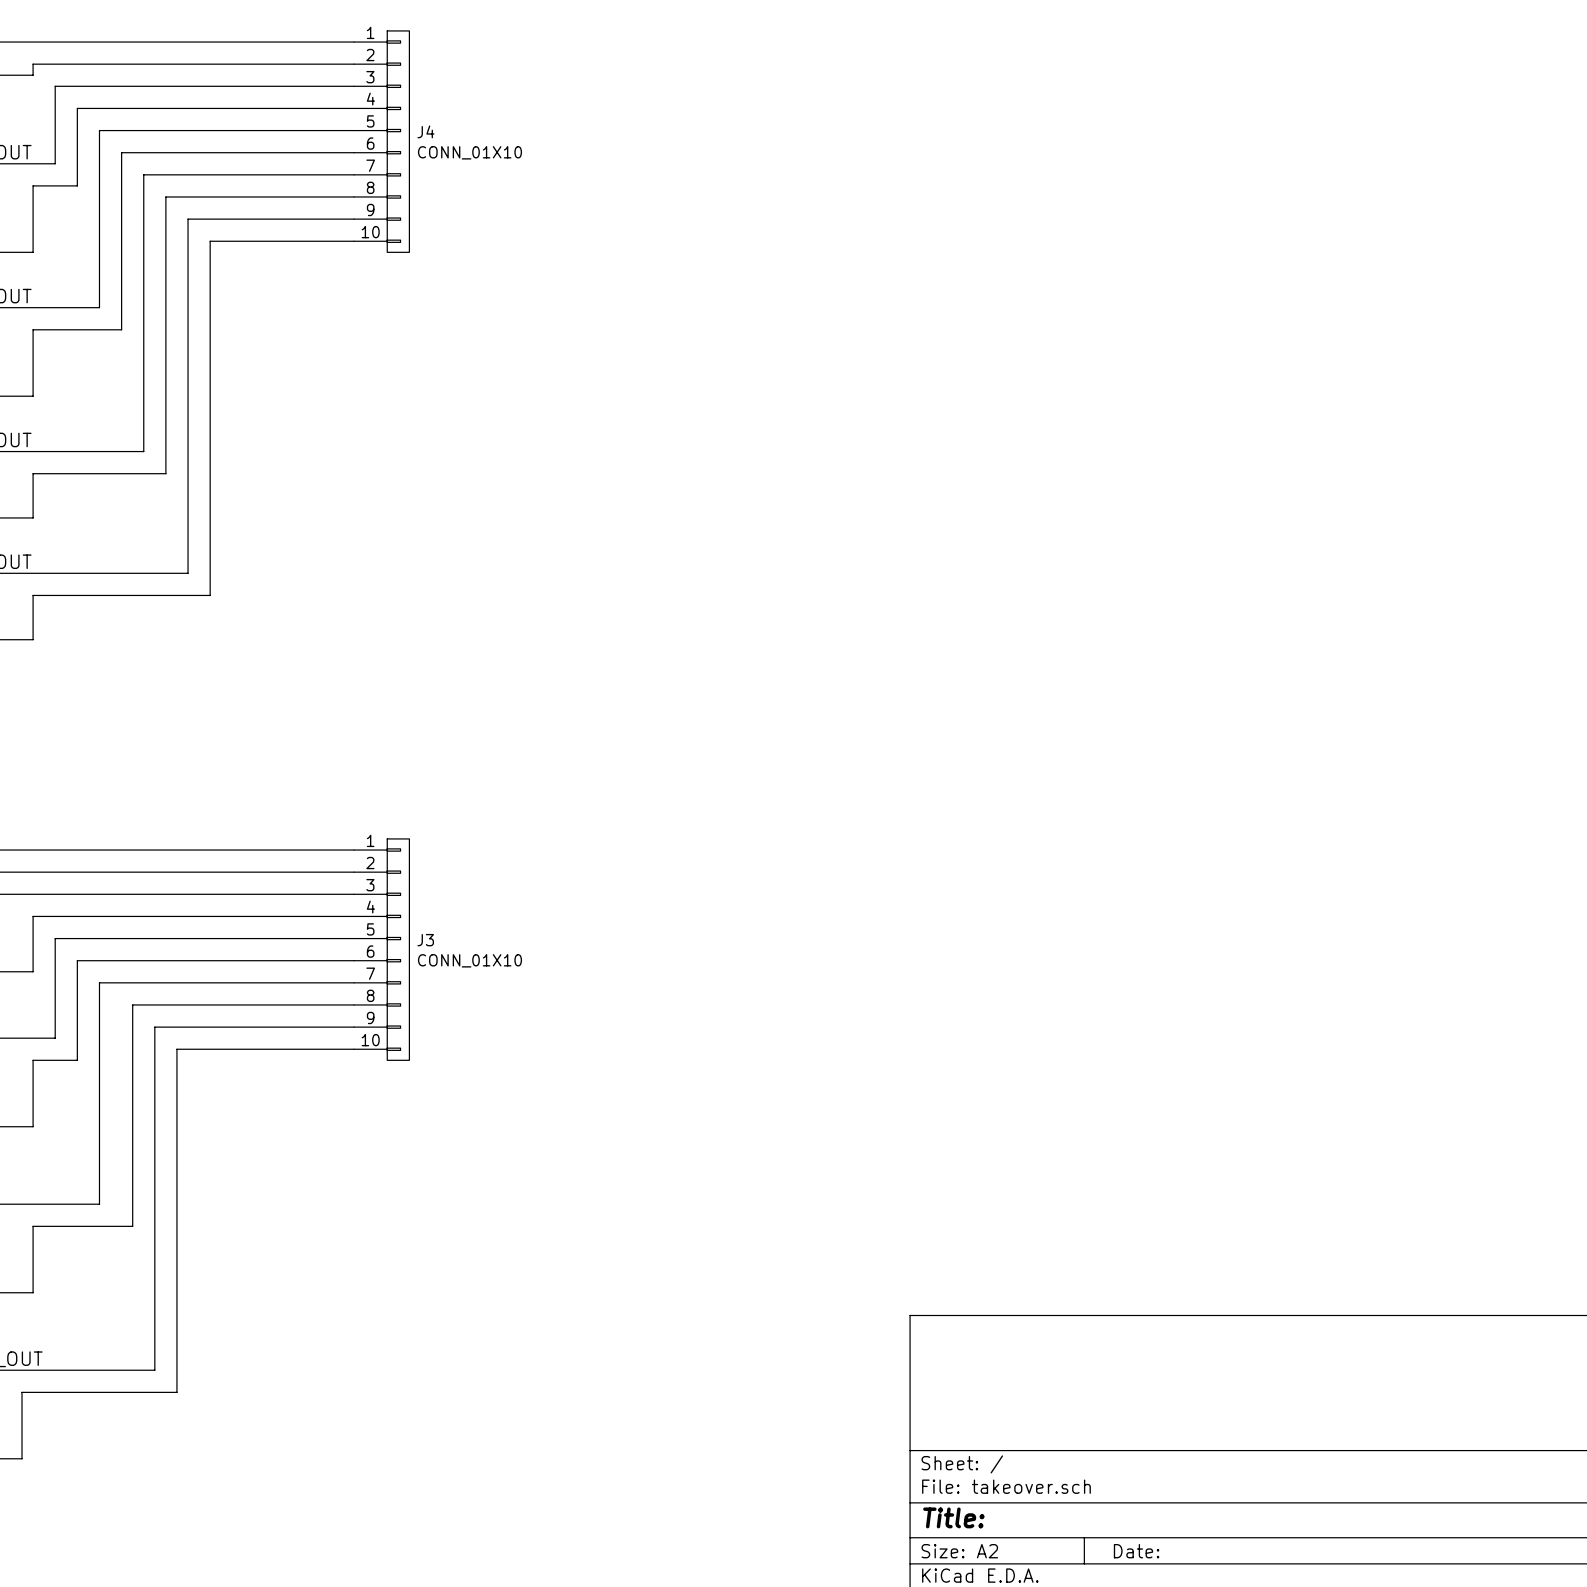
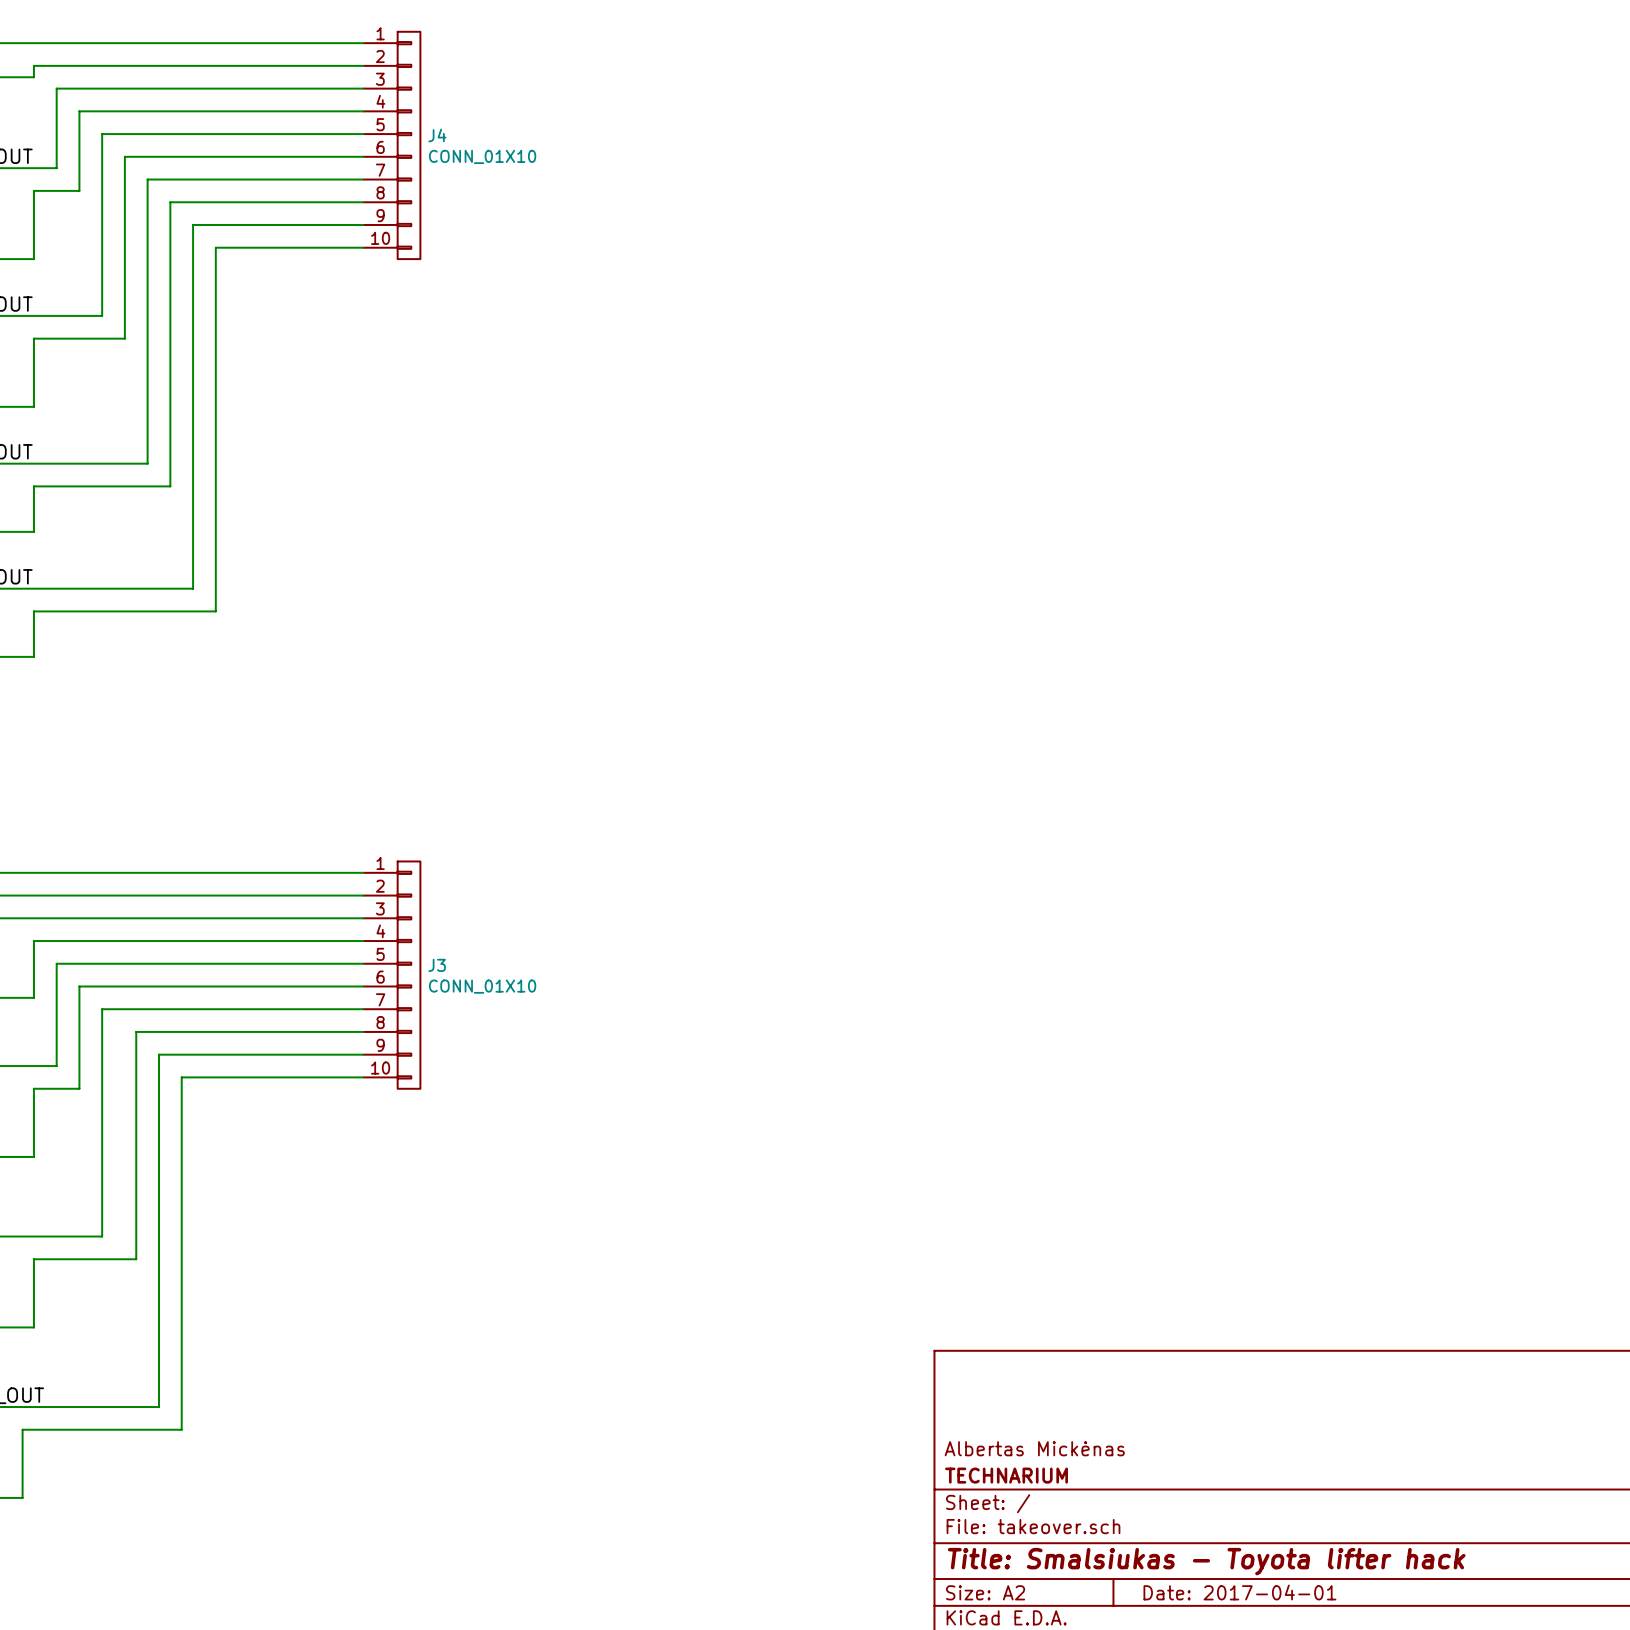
title block: none -> Albertas Mickėnas (1034, 1448)
title block: none -> TECHNARIUM (1006, 1475)
title block: Title: (953, 1517) -> Title: Smalsiukas - Toyota lifter hack (1206, 1561)
title block: Date: (1136, 1551) -> Date: 2017-04-01 (1239, 1592)

